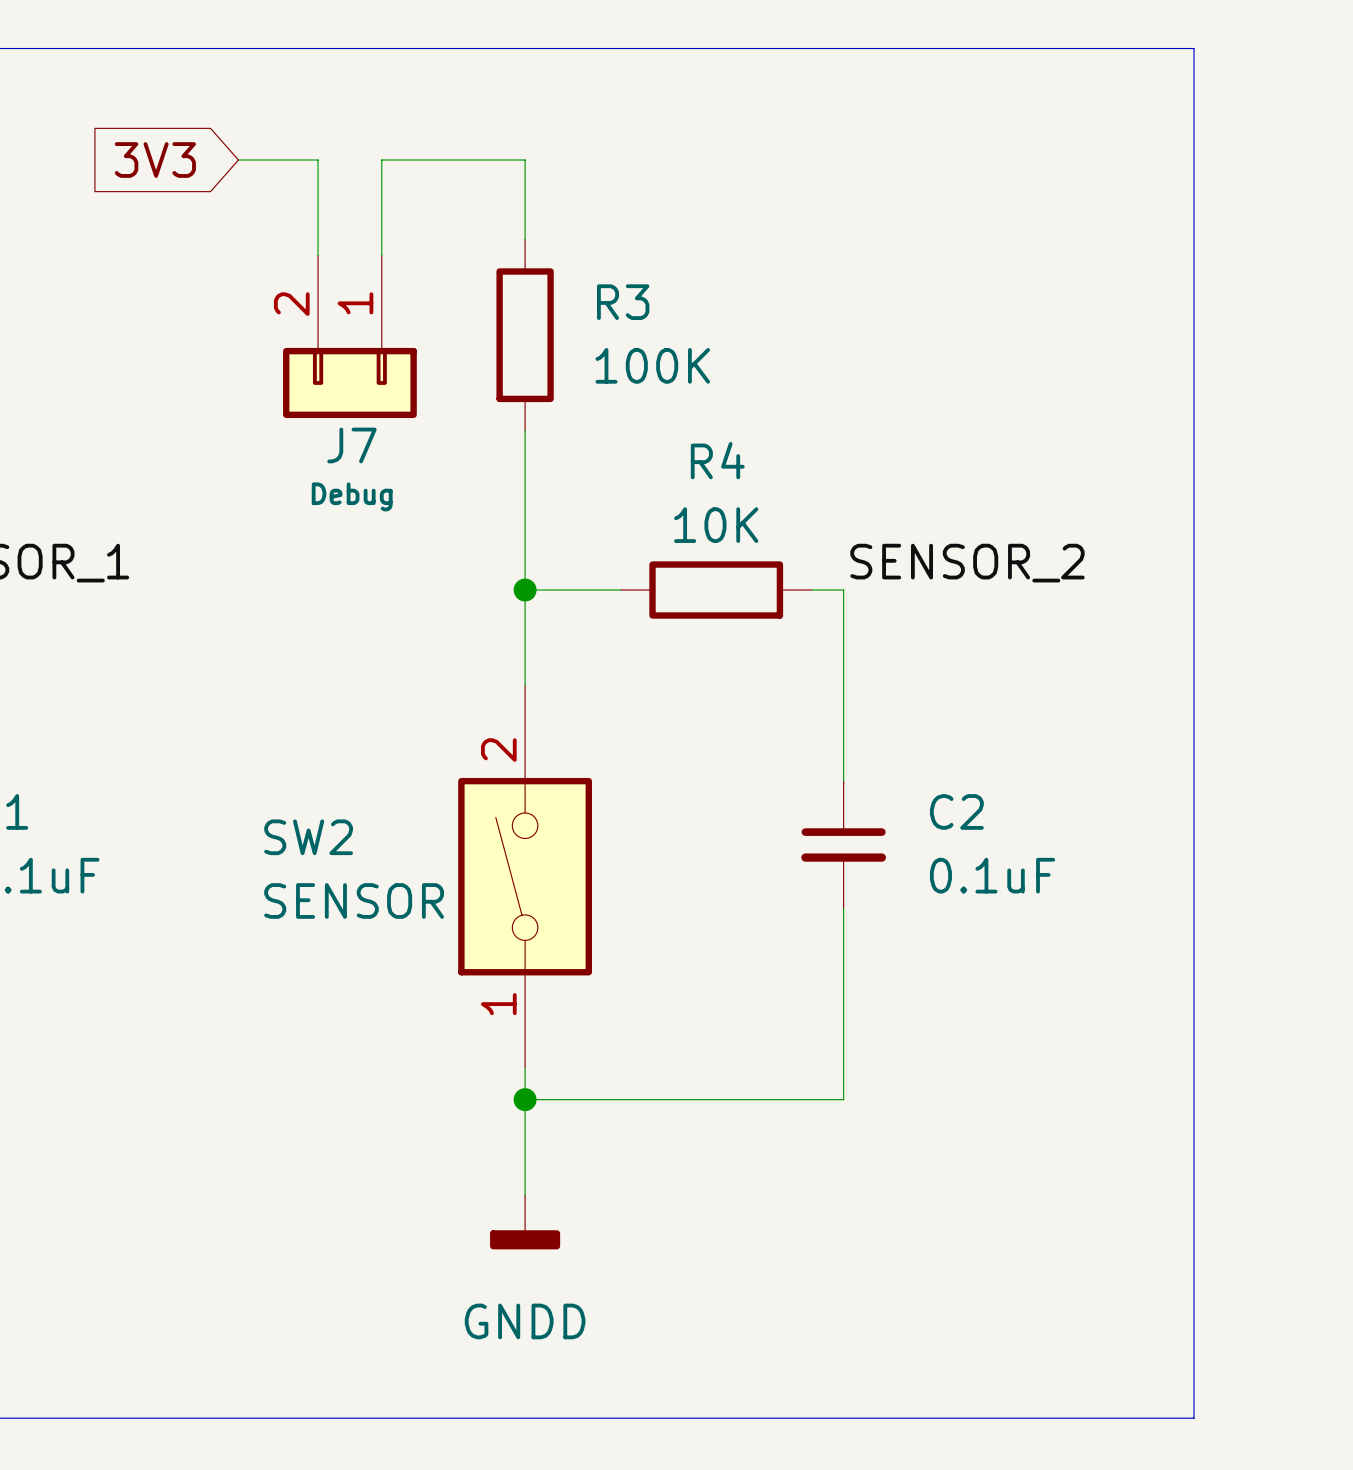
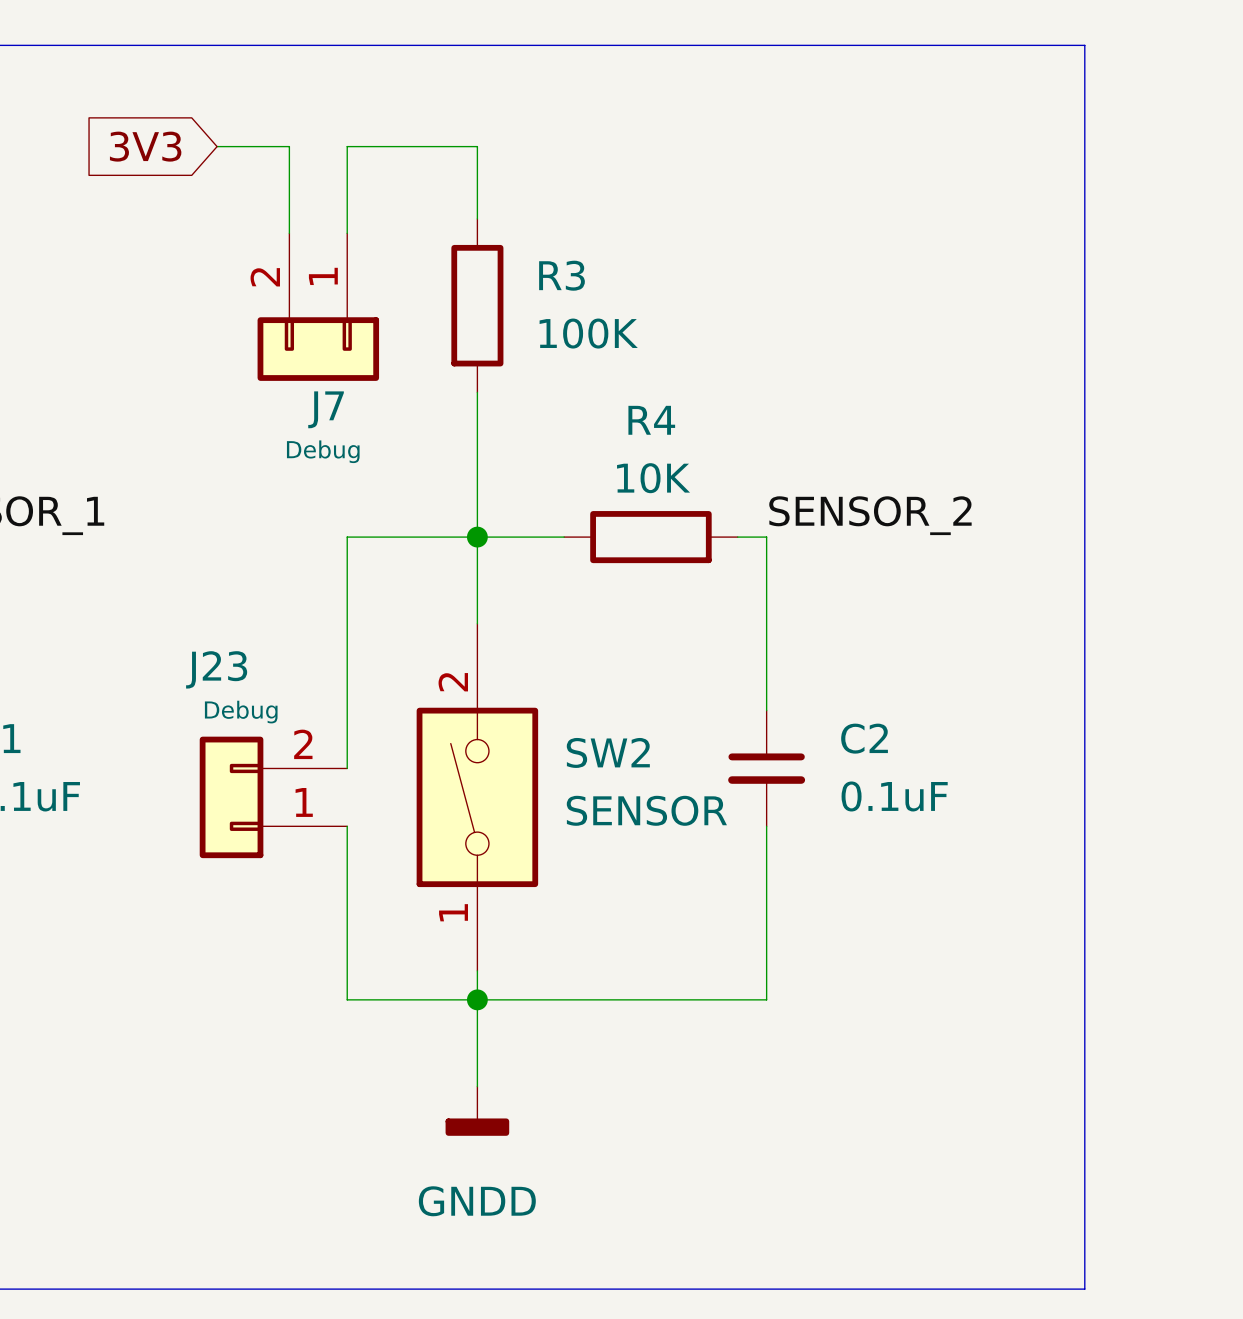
wire: none -> (477, 537) (347, 537) (347, 768)
SW2 name position: SW2 (308, 837) -> SW2 (608, 752)
J23: none -> Debug (273, 797)
SW2 value position: SENSOR (354, 900) -> SENSOR (646, 810)
wire: none -> (347, 826) (347, 999) (477, 999)

